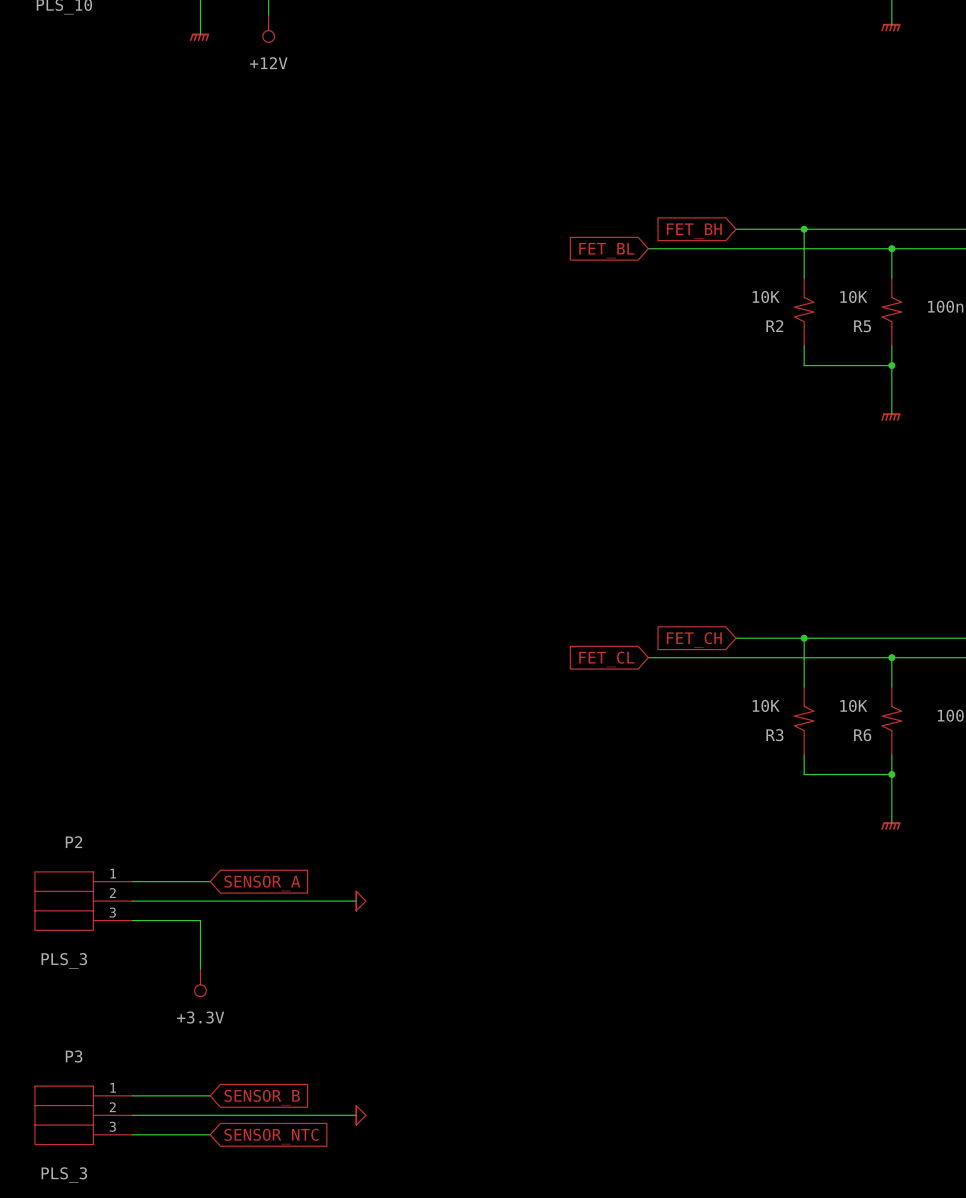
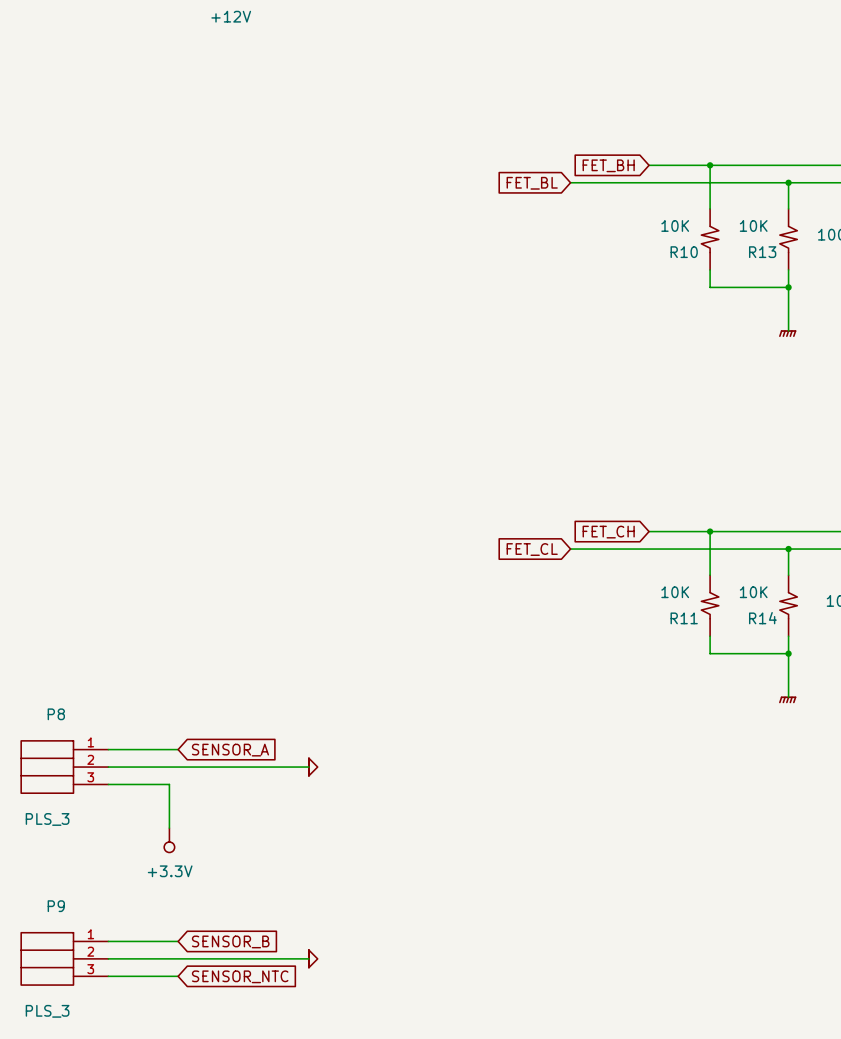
R2 name: R2 (774, 326) -> R10 (684, 252)
R5 name: R5 (862, 326) -> R13 (762, 252)
R3 name: R3 (774, 735) -> R11 (684, 618)
R6 name: R6 (862, 735) -> R14 (762, 618)
P2 name: P2 (73, 842) -> P8 (56, 714)
P3 name: P3 (74, 1056) -> P9 (56, 906)

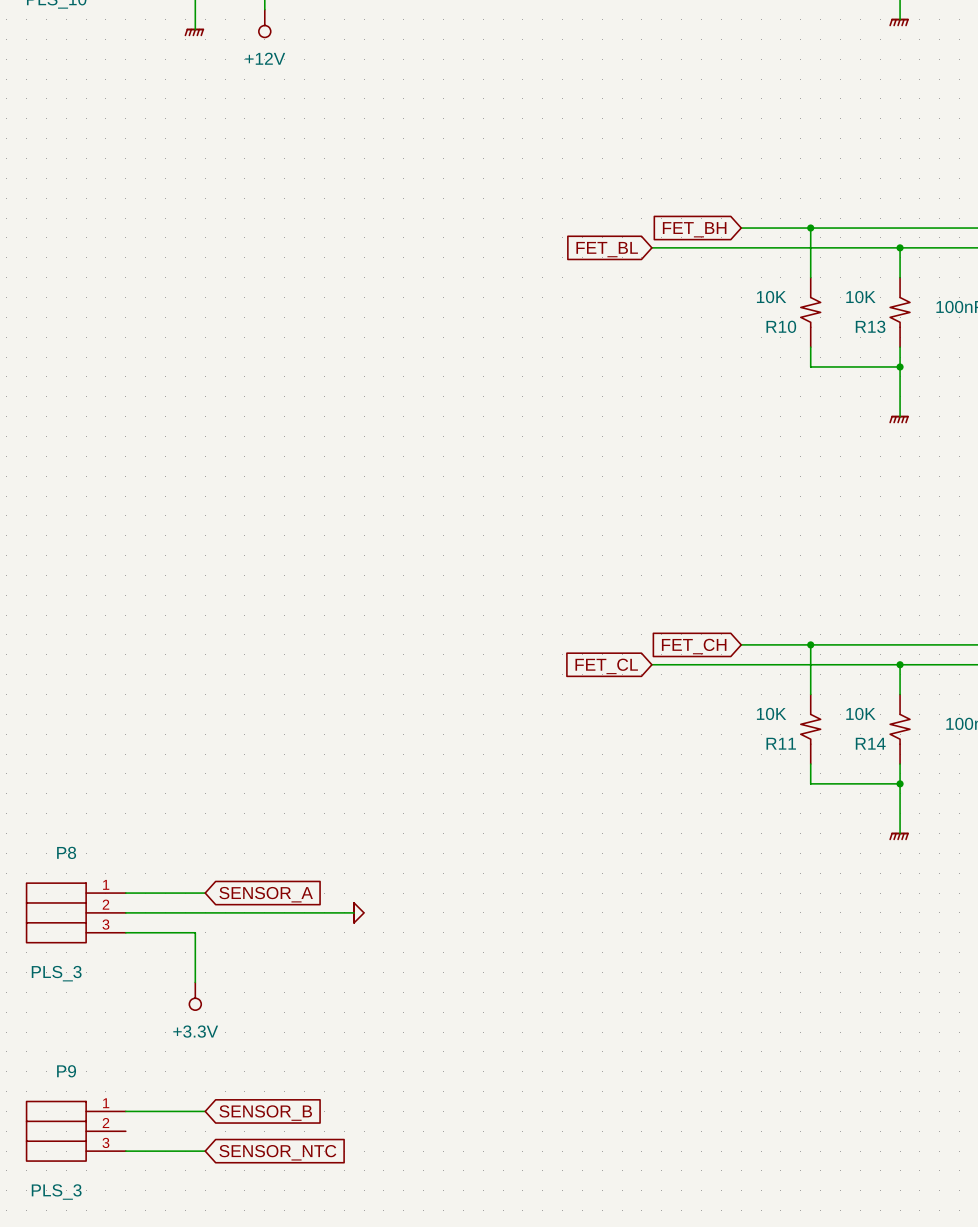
wire: (108, 958) (308, 958) -> none
power symbol: (313, 958) -> none

